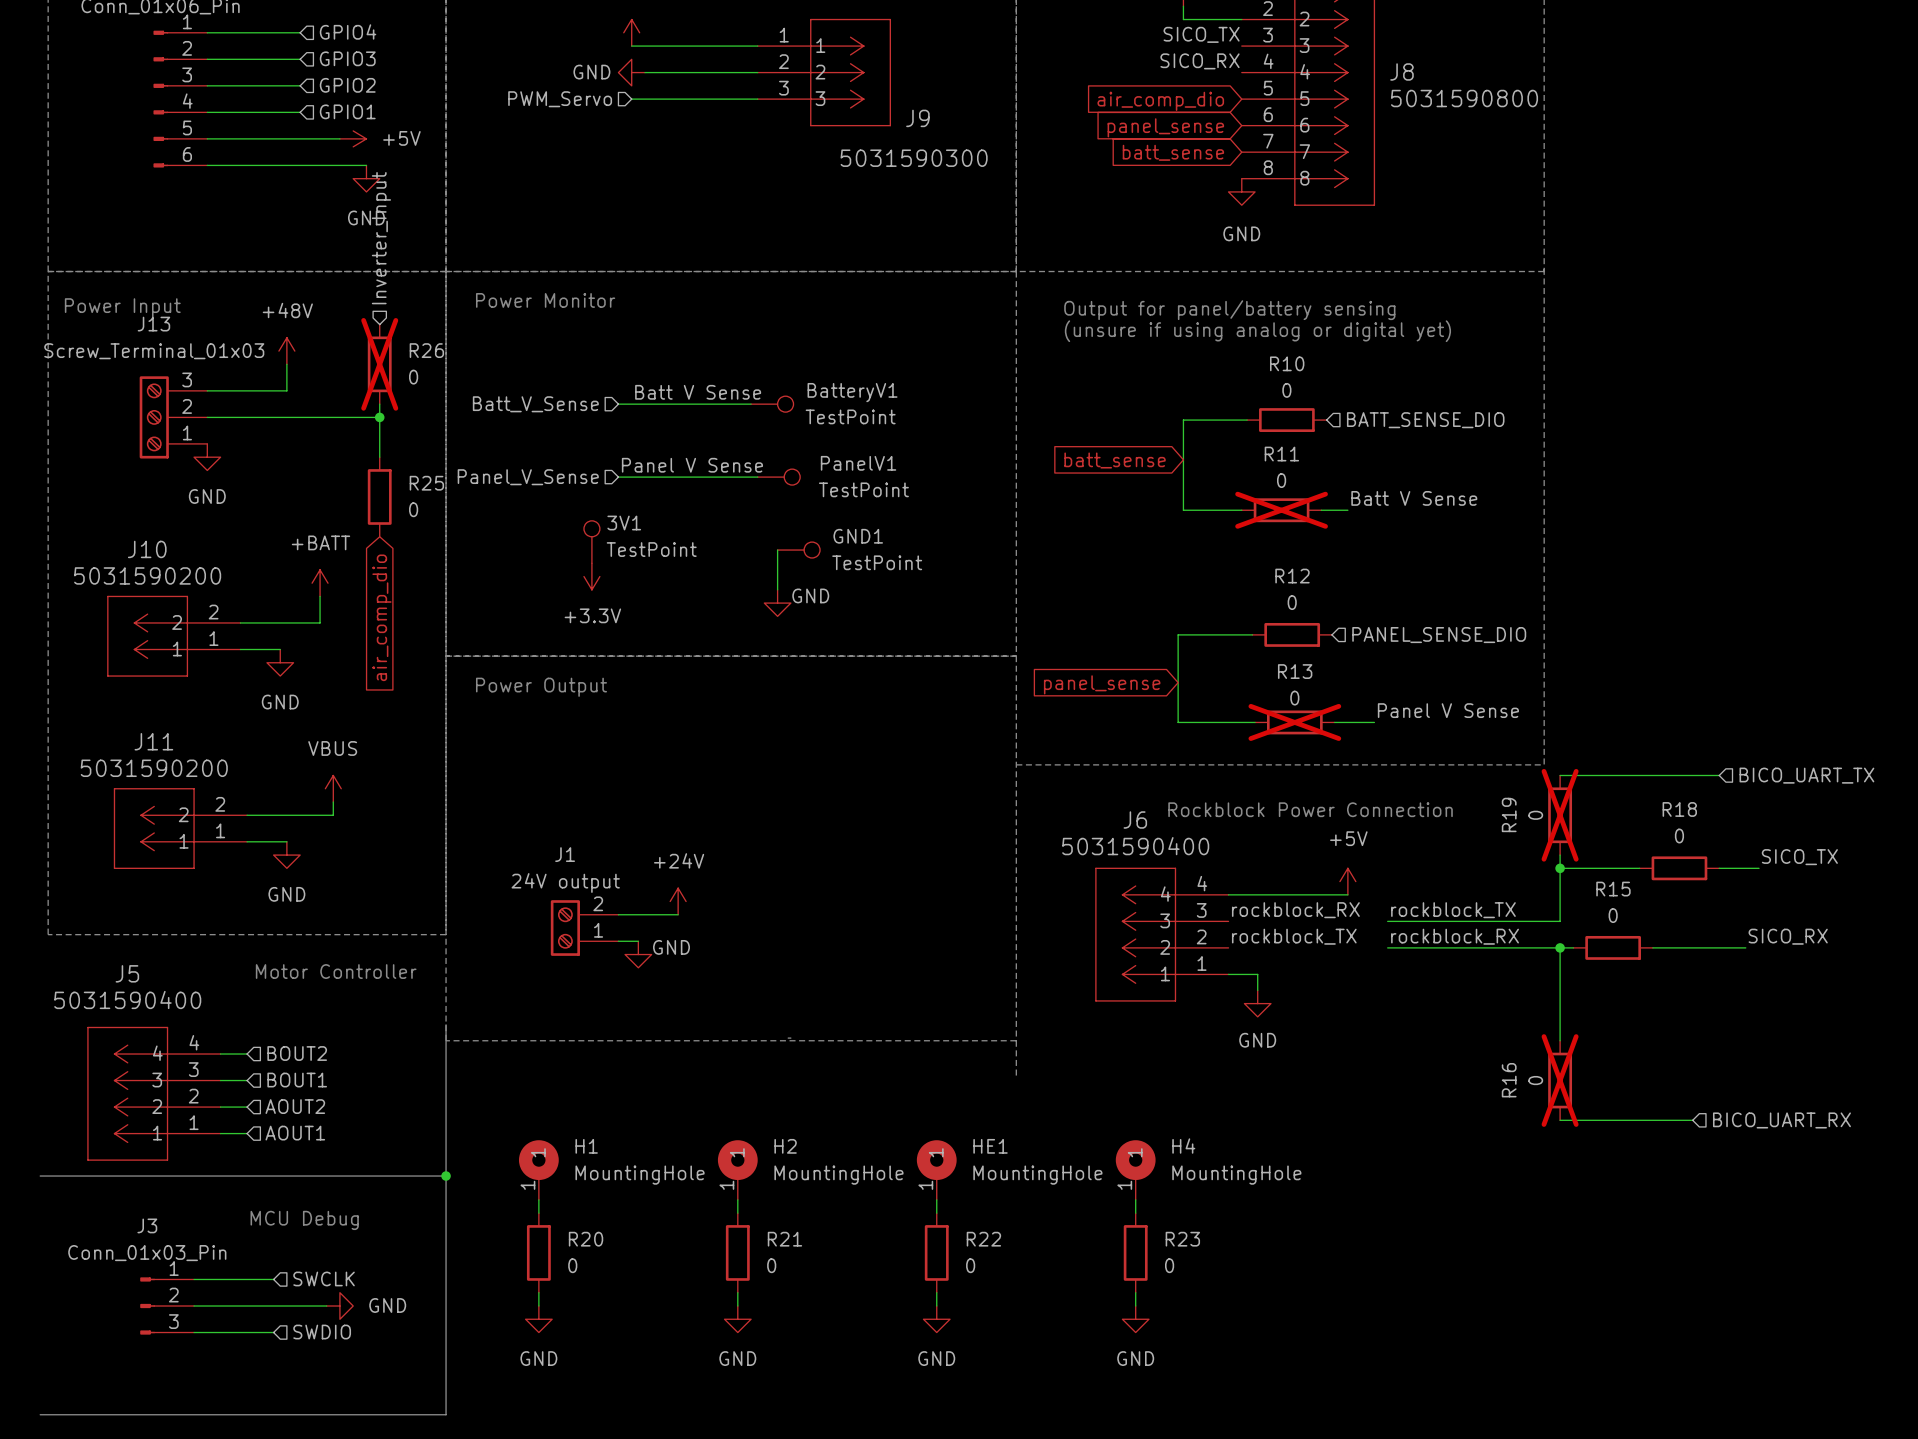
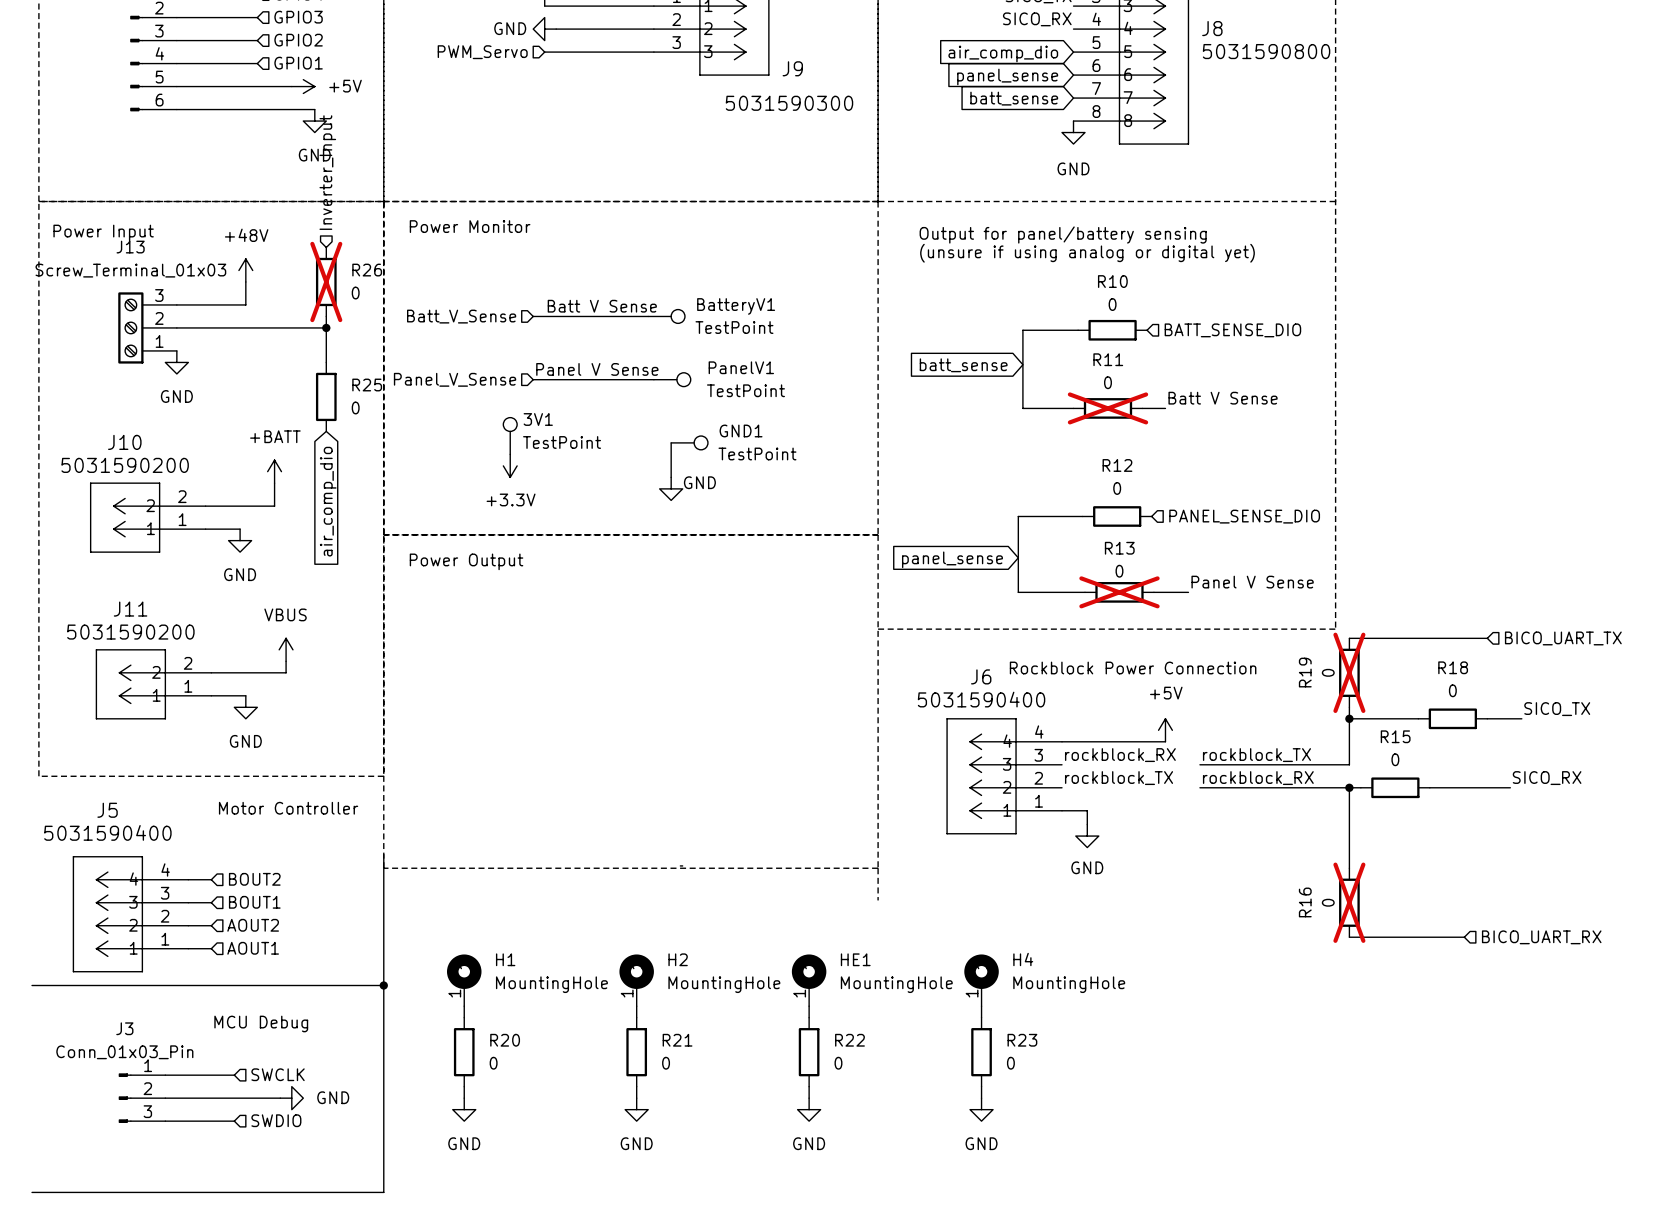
power symbol: +24V (678, 901) -> none
wire: (618, 914) (678, 914) -> none
J1: 24V output (584, 928) -> none
wire: (618, 941) (638, 941) -> none
power symbol: GND (638, 954) -> none

